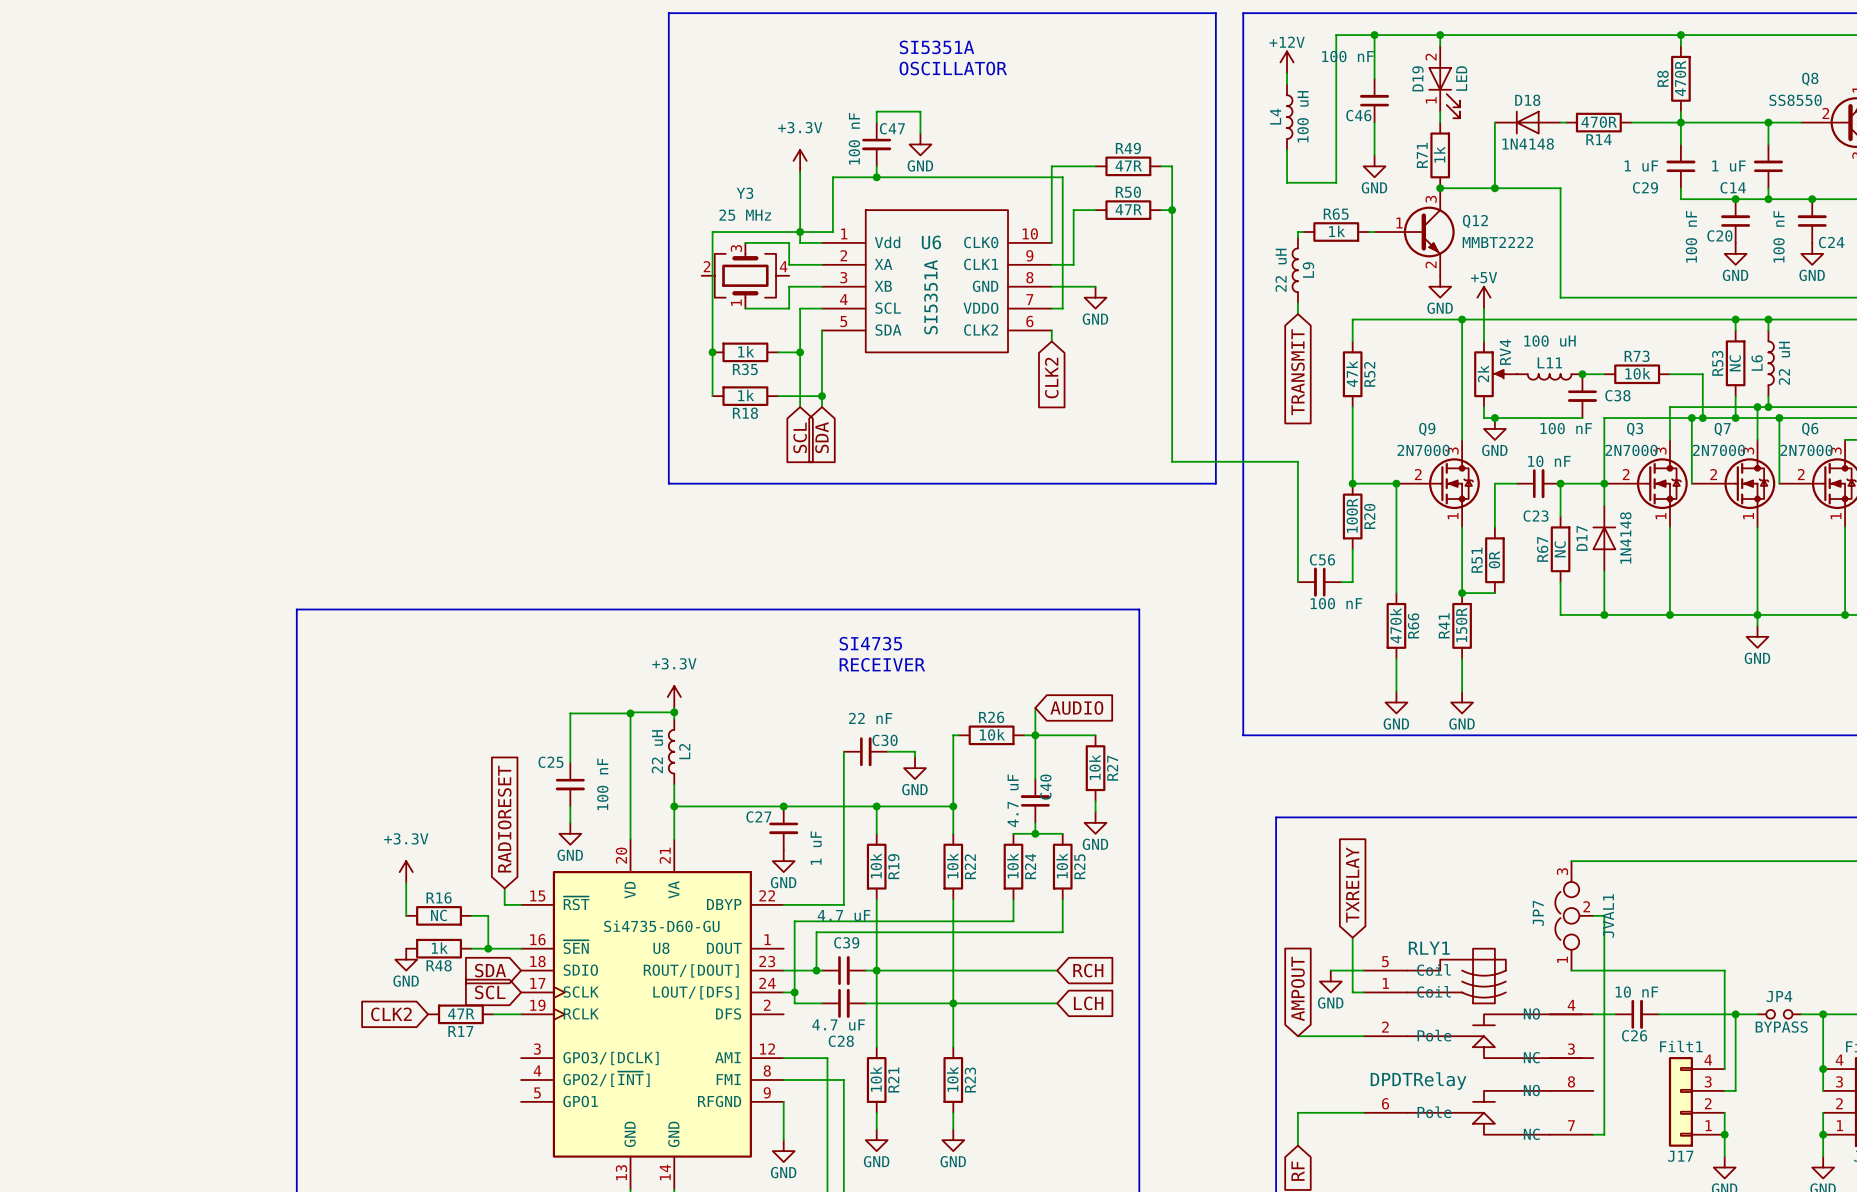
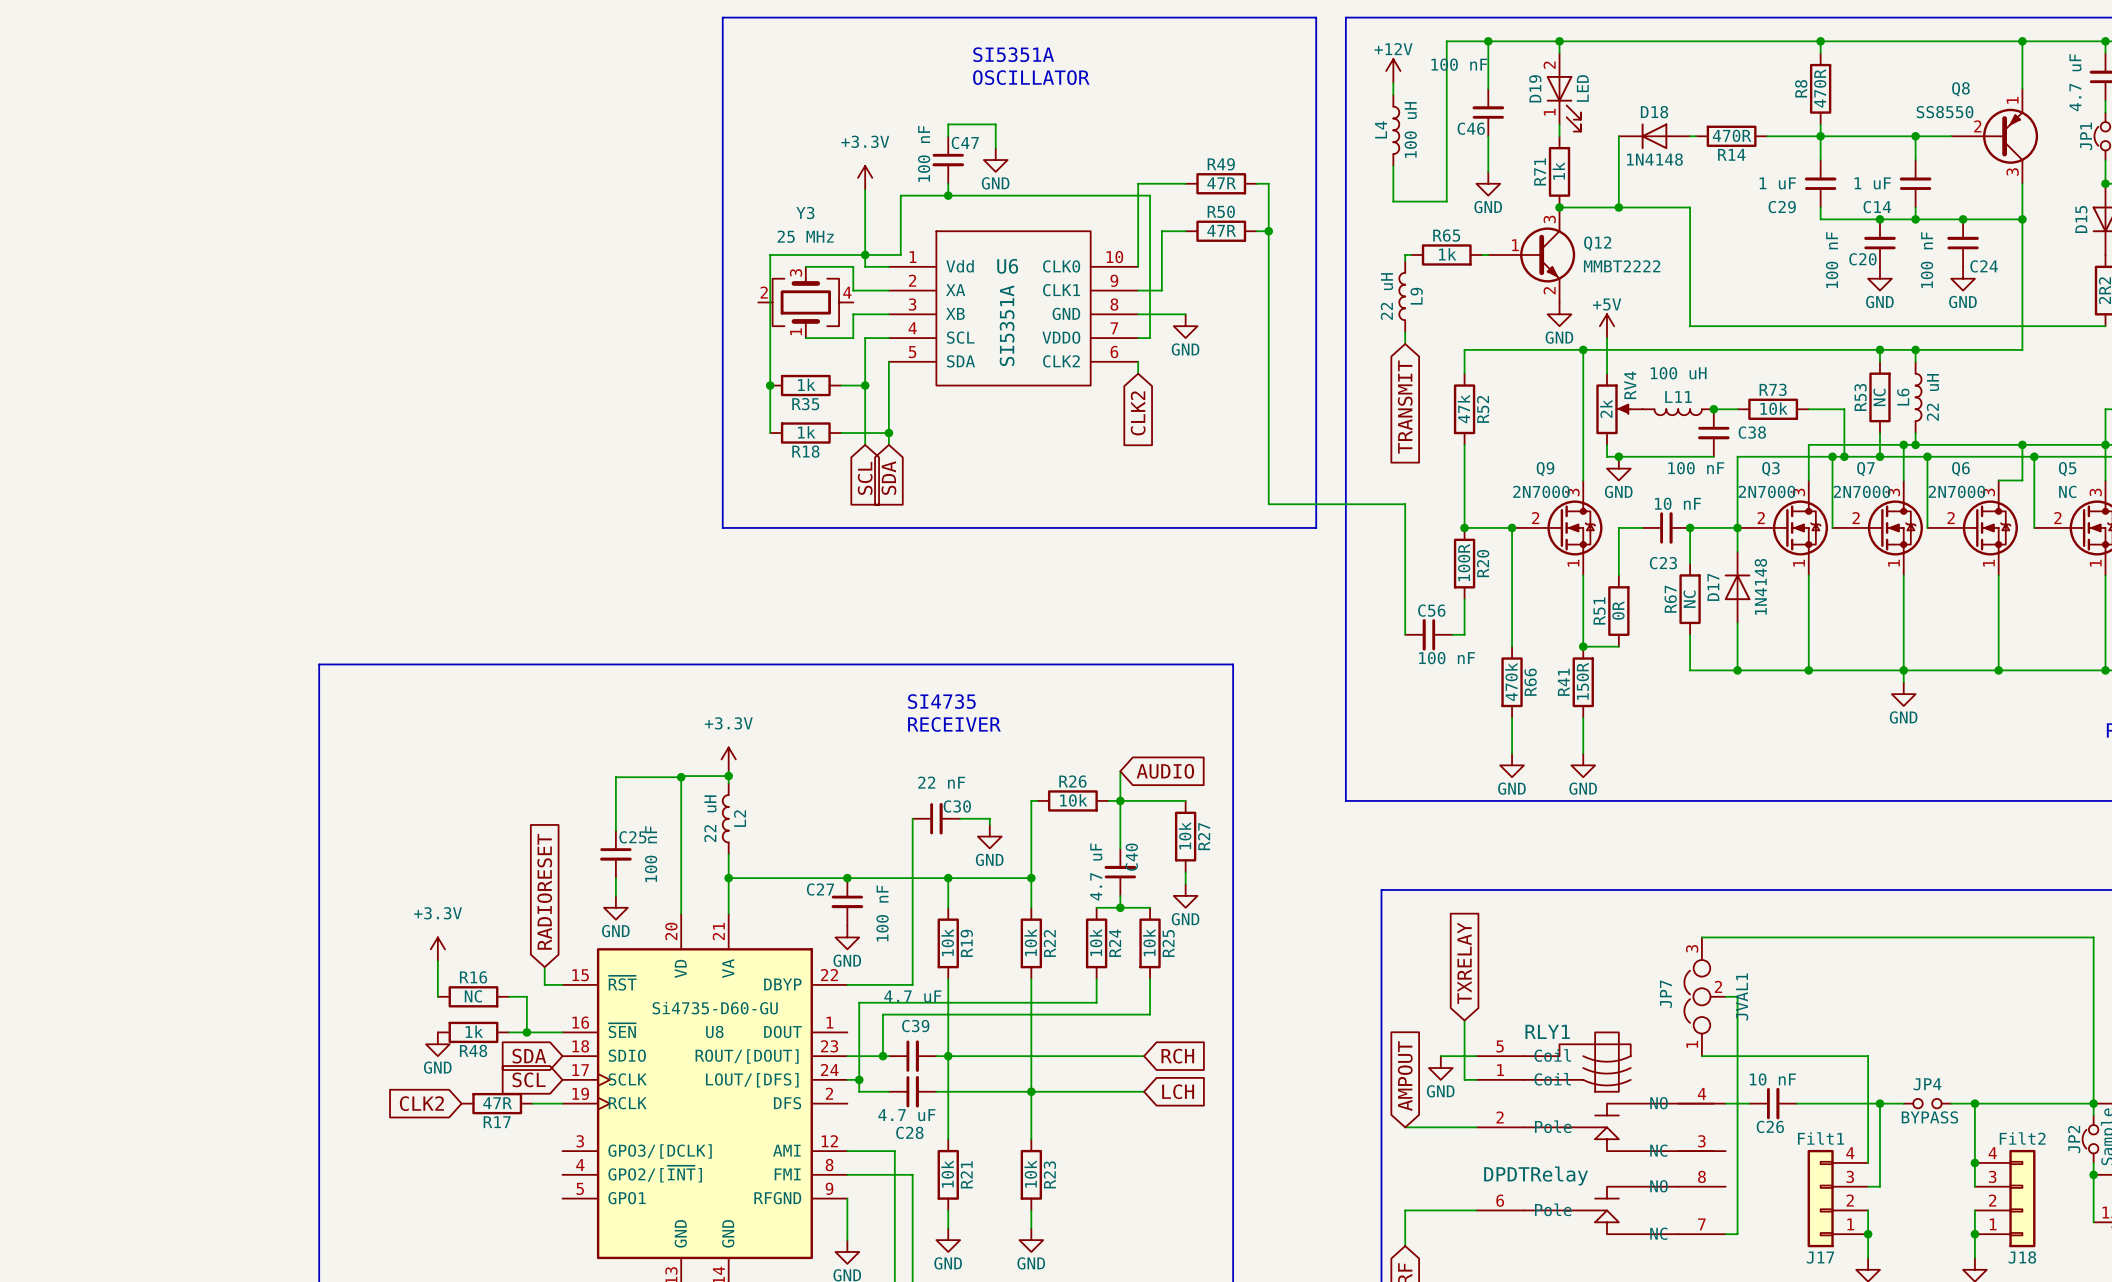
C25 name position: C25 (550, 762) -> C25 (632, 837)
C27 value: 1 uF (816, 848) -> 100 nF (882, 913)

